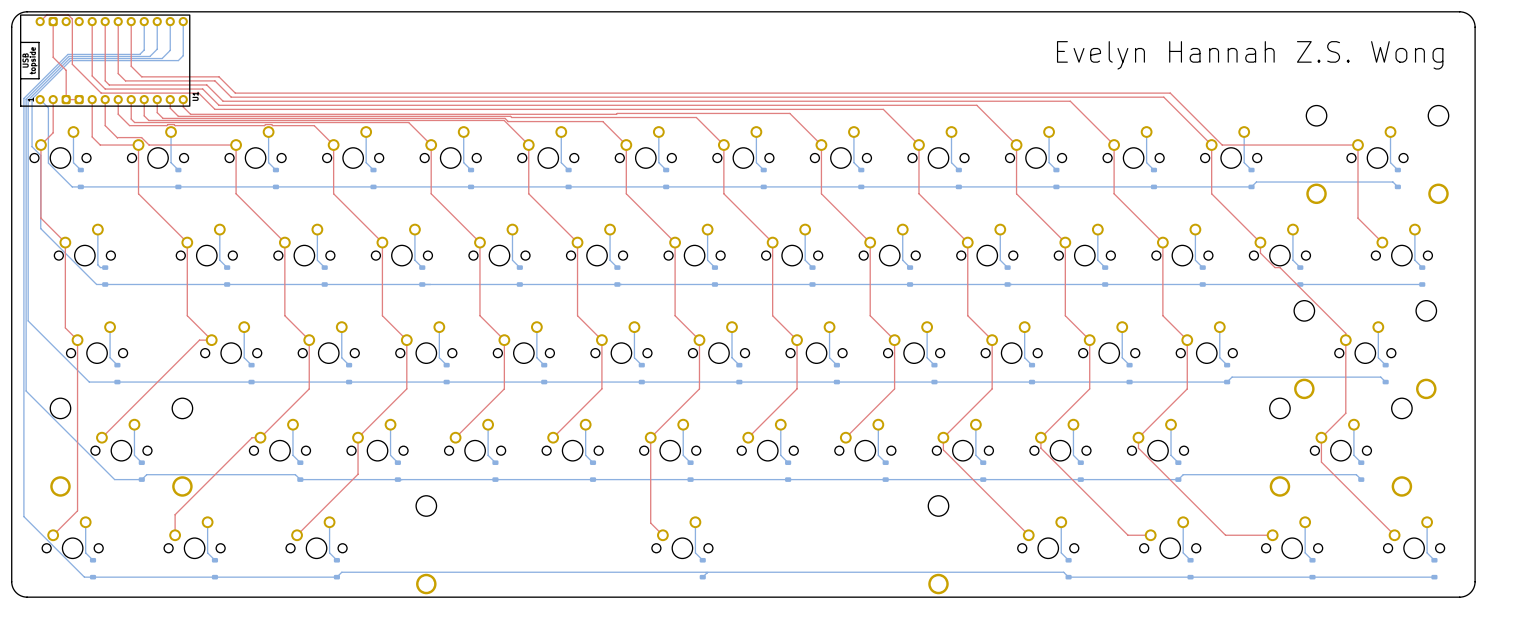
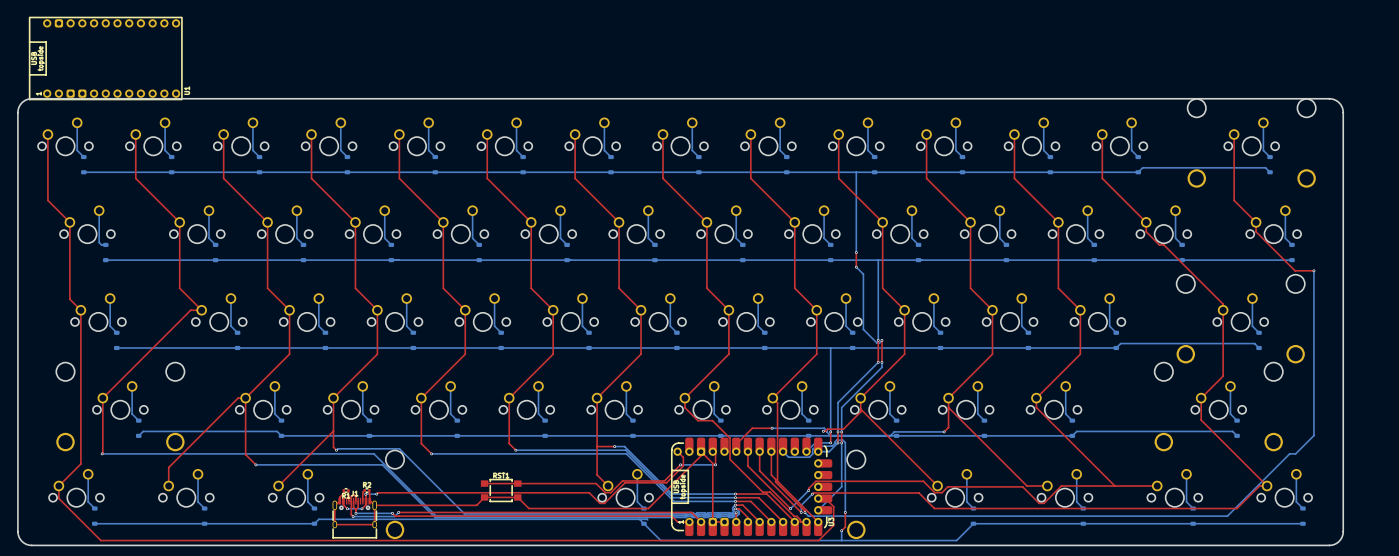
board edge: (27, 11) (1465, 12) (1473, 19) (1475, 27) (1473, 587) (1467, 595) (1459, 597) (21, 595) (14, 591) (11, 581) (11, 27) (16, 16) (27, 11) -> (31, 98) (21, 102) (17, 112) (17, 531) (20, 540) (28, 544) (1329, 545) (1337, 542) (1342, 535) (1343, 112) (1340, 104) (1332, 99) (31, 98)
top track: (40, 21) (46, 14) (68, 14) (72, 19) (72, 64) (101, 93) (198, 93) (214, 109) (883, 109) (918, 145) -> none
top track: (53, 21) (53, 57) (66, 70) (66, 99) (79, 99) -> none
top track: (92, 21) (92, 76) (105, 89) (202, 89) (219, 105) (976, 105) (1016, 145) -> none
top track: (105, 21) (105, 80) (109, 84) (206, 84) (223, 101) (1070, 101) (1114, 145) -> none
top track: (118, 21) (118, 73) (125, 80) (214, 80) (231, 97) (1163, 97) (1211, 145) -> none
top track: (131, 21) (131, 66) (141, 76) (219, 76) (235, 93) (1170, 93) (1222, 145) (1357, 145) -> none
bottom track: (144, 21) (144, 50) (139, 54) (67, 54) (23, 98) (23, 516) (84, 577) (93, 577) -> none
bottom track: (157, 21) (157, 49) (149, 56) (68, 56) (26, 99) (26, 391) (114, 479) (141, 479) -> none
bottom track: (170, 21) (170, 50) (162, 58) (69, 58) (28, 100) (28, 320) (89, 382) (117, 382) -> none
bottom track: (183, 21) (183, 55) (178, 60) (70, 60) (32, 99) (32, 146) (40, 155) (40, 228) (96, 284) (105, 284) -> none
text: Evelyn Hannah Z.S. Wong (1250, 55) -> none
bottom track: (40, 99) (48, 107) (48, 163) (72, 186) (80, 186) -> none
top track: (53, 99) (53, 132) (40, 145) -> none
top track: (92, 99) (92, 137) (100, 145) (138, 145) -> none
top track: (105, 99) (105, 125) (117, 137) (141, 137) (149, 145) (236, 145) -> none
top track: (118, 99) (118, 114) (129, 125) (314, 125) (333, 145) -> none
top track: (131, 99) (131, 119) (134, 122) (408, 122) (431, 145) -> none
top track: (144, 99) (144, 115) (148, 120) (504, 120) (528, 145) -> none
top track: (157, 99) (157, 112) (163, 118) (505, 118) (508, 121) (602, 121) (626, 145) -> none
top track: (170, 99) (170, 108) (178, 116) (696, 117) (723, 145) -> none
top track: (183, 99) (183, 106) (190, 114) (789, 113) (821, 145) -> none
bottom track: none -> (856, 172) (856, 252)
top track: none -> (1256, 222) (1256, 231) (1295, 270) (1313, 270)
top track: none -> (856, 252) (856, 267)
via: none -> (856, 252)
bottom track: none -> (878, 260) (878, 340)
bottom track: none -> (856, 267) (863, 274) (863, 329) (877, 343) (881, 340)
via: none -> (856, 267)
bottom track: none -> (1313, 270) (1313, 435) (1295, 453) (1289, 453) (1227, 516) (808, 516) (804, 512)
via: none -> (1313, 270)
top track: none -> (878, 340) (878, 362)
via: none -> (878, 340)
top track: none -> (881, 340) (881, 362)
via: none -> (881, 340)
bottom track: none -> (830, 348) (830, 431)
bottom track: none -> (878, 362) (838, 402) (838, 431)
via: none -> (878, 362)
bottom track: none -> (881, 362) (881, 367) (841, 407) (841, 431)
via: none -> (881, 362)
top track: none -> (102, 398) (102, 453)
top track: none -> (245, 398) (245, 454) (255, 464)
top track: none -> (421, 398) (421, 443) (431, 453)
top track: none -> (509, 398) (509, 443) (515, 450)
top track: none -> (684, 398) (684, 407) (697, 420) (712, 420) (730, 438) (730, 459) (762, 492) (770, 492) (794, 516) (797, 516) (800, 521) (806, 521)
top track: none -> (772, 398) (777, 402) (777, 481) (818, 521)
top track: none -> (948, 407) (948, 427) (944, 431)
top track: none -> (860, 409) (860, 411) (843, 429) (827, 429) (823, 431)
bottom track: none -> (772, 428) (824, 428) (830, 435) (890, 435) (894, 431) (944, 431)
top track: none -> (772, 428) (752, 428) (736, 444) (736, 451)
via: none -> (772, 428)
top track: none -> (333, 431) (333, 447) (336, 450)
via: none -> (823, 431)
top track: none -> (830, 431) (830, 442)
via: none -> (830, 431)
top track: none -> (838, 431) (838, 442)
via: none -> (838, 431)
top track: none -> (841, 431) (841, 442)
via: none -> (841, 431)
via: none -> (944, 431)
bottom track: none -> (830, 442) (815, 442) (806, 451)
via: none -> (830, 442)
bottom track: none -> (838, 442) (829, 451) (818, 451)
via: none -> (838, 442)
bottom track: none -> (841, 442) (841, 486) (818, 510)
via: none -> (841, 442)
top track: none -> (597, 446) (614, 446)
bottom track: none -> (614, 446) (624, 446) (672, 494) (735, 494)
via: none -> (614, 446)
bottom track: none -> (336, 450) (399, 448) (464, 513) (731, 513) (735, 505)
via: none -> (336, 450)
bottom track: none -> (515, 450) (625, 450) (673, 497) (735, 497)
via: none -> (515, 450)
top track: none -> (677, 451) (683, 457) (683, 466) (666, 482) (625, 482) (604, 503) (599, 503) (589, 492) (376, 494)
top track: none -> (712, 451) (715, 454) (715, 464)
top track: none -> (747, 451) (747, 466) (790, 508)
top track: none -> (759, 451) (759, 470) (801, 512)
top track: none -> (771, 451) (771, 475) (804, 512)
bottom track: none -> (783, 451) (788, 457) (809, 457) (815, 446) (832, 446) (836, 440) (842, 440) (845, 442) (845, 512)
bottom track: none -> (102, 453) (373, 453) (435, 515) (732, 515) (736, 512)
via: none -> (102, 453)
bottom track: none -> (431, 453) (626, 453) (673, 501) (735, 501)
via: none -> (431, 453)
bottom track: none -> (255, 464) (382, 464) (434, 517) (732, 517) (739, 513) (735, 508)
via: none -> (255, 464)
bottom track: none -> (680, 464) (715, 464)
top track: none -> (680, 464) (664, 480) (622, 480) (610, 492) (605, 492) (596, 483) (484, 483)
via: none -> (680, 464)
via: none -> (715, 464)
top track: none -> (58, 485) (58, 498) (100, 540) (818, 540) (833, 525) (833, 506) (825, 498) (818, 498)
top track: none -> (1114, 485) (1061, 485) (1044, 503) (1039, 503) (1022, 486) (947, 486) (941, 492) (934, 492) (923, 481) (815, 481) (808, 490)
top track: none -> (1267, 485) (1259, 485) (1237, 508) (934, 508) (919, 493) (812, 494)
part: none -> (751, 486)
top track: none -> (343, 490) (339, 501) (334, 505) (334, 524) (374, 524) (374, 505)
part: none -> (346, 490)
top track: none -> (348, 490) (348, 501)
top track: none -> (364, 490) (362, 492) (362, 501)
part: none -> (367, 490)
top track: none -> (369, 490) (369, 501) (374, 505)
part: none -> (501, 490)
bottom track: none -> (808, 490) (790, 508)
via: none -> (808, 490)
top track: none -> (365, 494) (366, 504) (362, 508)
via: none -> (365, 494)
bottom track: none -> (376, 494) (365, 494)
via: none -> (376, 494)
top track: none -> (735, 494) (766, 494) (794, 521)
via: none -> (735, 494)
bottom track: none -> (812, 494) (801, 505) (801, 512)
via: none -> (812, 494)
top track: none -> (735, 497) (758, 497) (783, 521)
via: none -> (735, 497)
top track: none -> (343, 501) (343, 504) (347, 508)
top track: none -> (353, 501) (353, 507) (355, 509)
top track: none -> (355, 501) (353, 494) (351, 496) (351, 514) (353, 516)
top track: none -> (358, 501) (355, 513)
top track: none -> (735, 501) (750, 501) (771, 521)
via: none -> (735, 501)
top track: none -> (374, 505) (476, 505) (484, 497) (517, 497) (528, 508) (648, 508) (701, 455) (701, 451) (712, 463) (712, 521) (724, 521)
top track: none -> (735, 505) (742, 505) (759, 521)
via: none -> (735, 505)
bottom track: none -> (347, 508) (362, 508)
via: none -> (347, 508)
via: none -> (362, 508)
top track: none -> (735, 508) (739, 508) (747, 517) (747, 521)
via: none -> (735, 508)
via: none -> (790, 508)
bottom track: none -> (398, 512) (394, 516) (353, 516)
top track: none -> (398, 512) (691, 512) (701, 521)
via: none -> (398, 512)
top track: none -> (736, 512) (736, 521)
via: none -> (736, 512)
via: none -> (801, 512)
via: none -> (804, 512)
top track: none -> (845, 512) (845, 527) (841, 530)
via: none -> (845, 512)
bottom track: none -> (355, 513) (392, 513)
via: none -> (355, 513)
top track: none -> (392, 513) (395, 516) (671, 516) (677, 521) (689, 521)
via: none -> (392, 513)
via: none -> (353, 516)
part: none -> (354, 517)
bottom track: (702, 577) (707, 572) (1063, 572) (1068, 577) -> (639, 519) (660, 540) (956, 540) (973, 523)
bottom track: none -> (841, 530) (841, 540)
via: none -> (841, 530)

